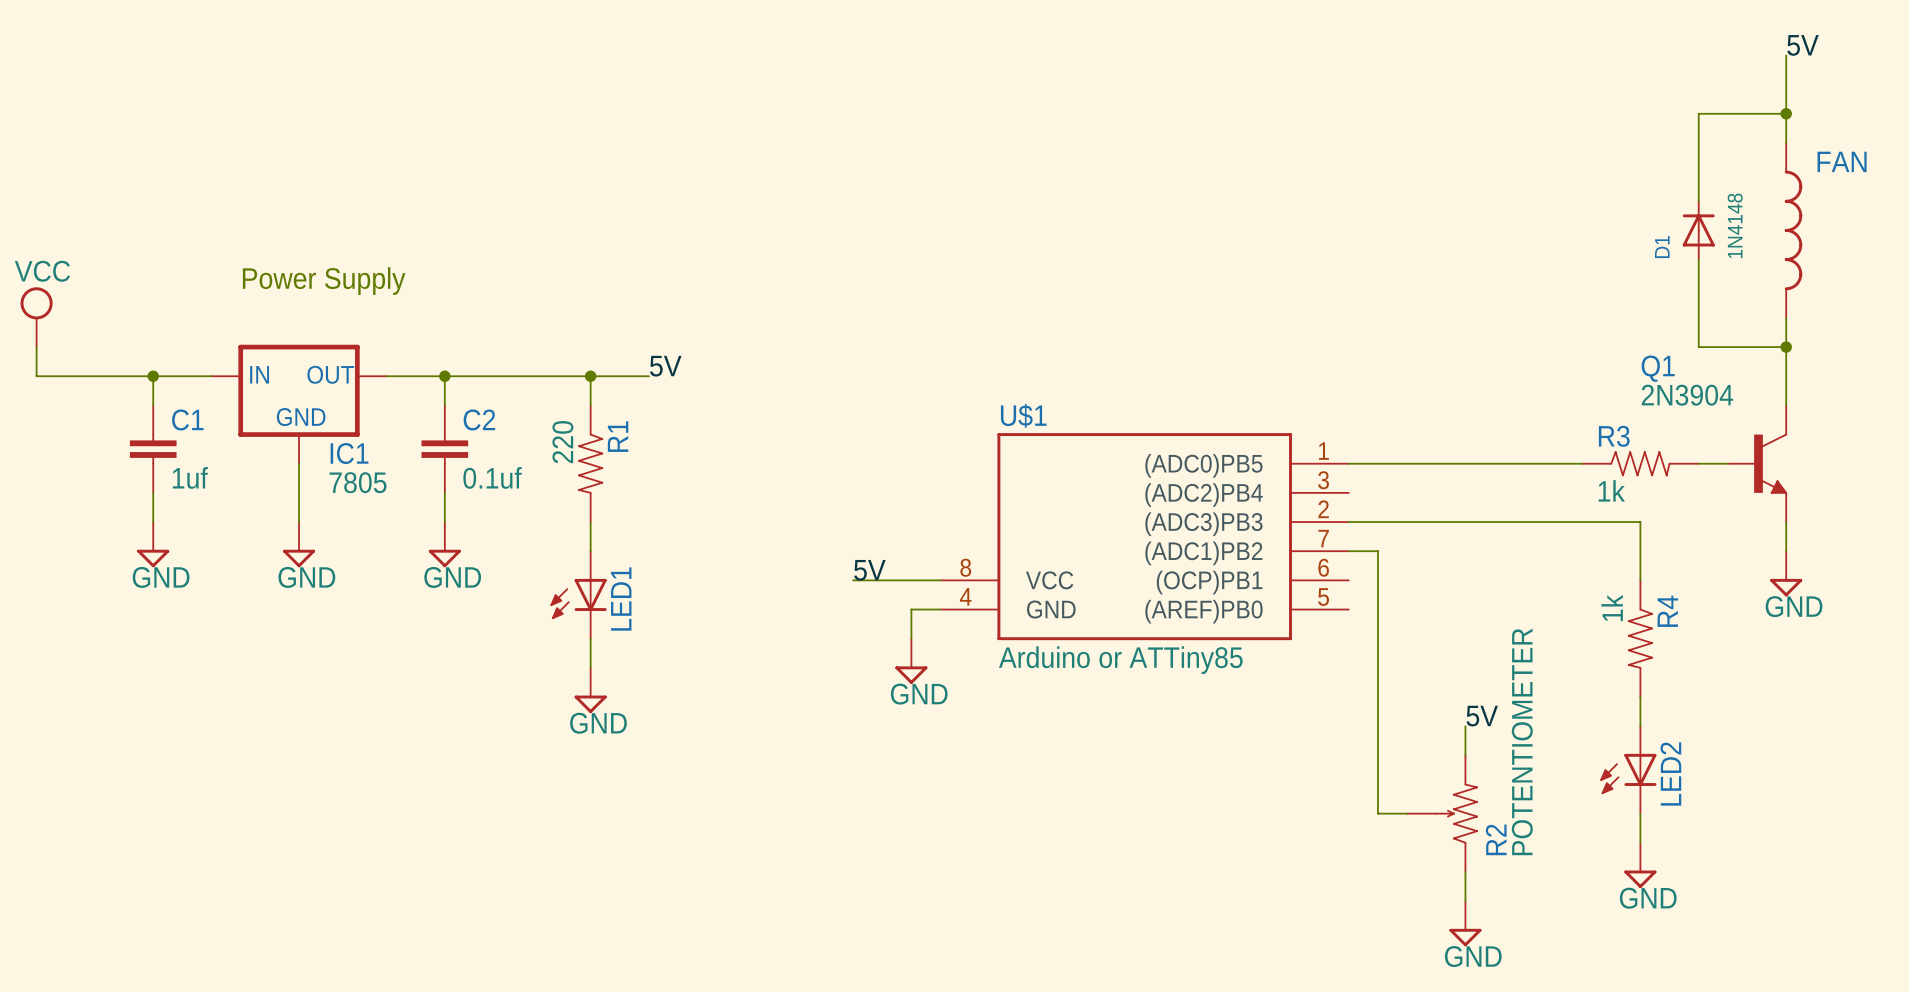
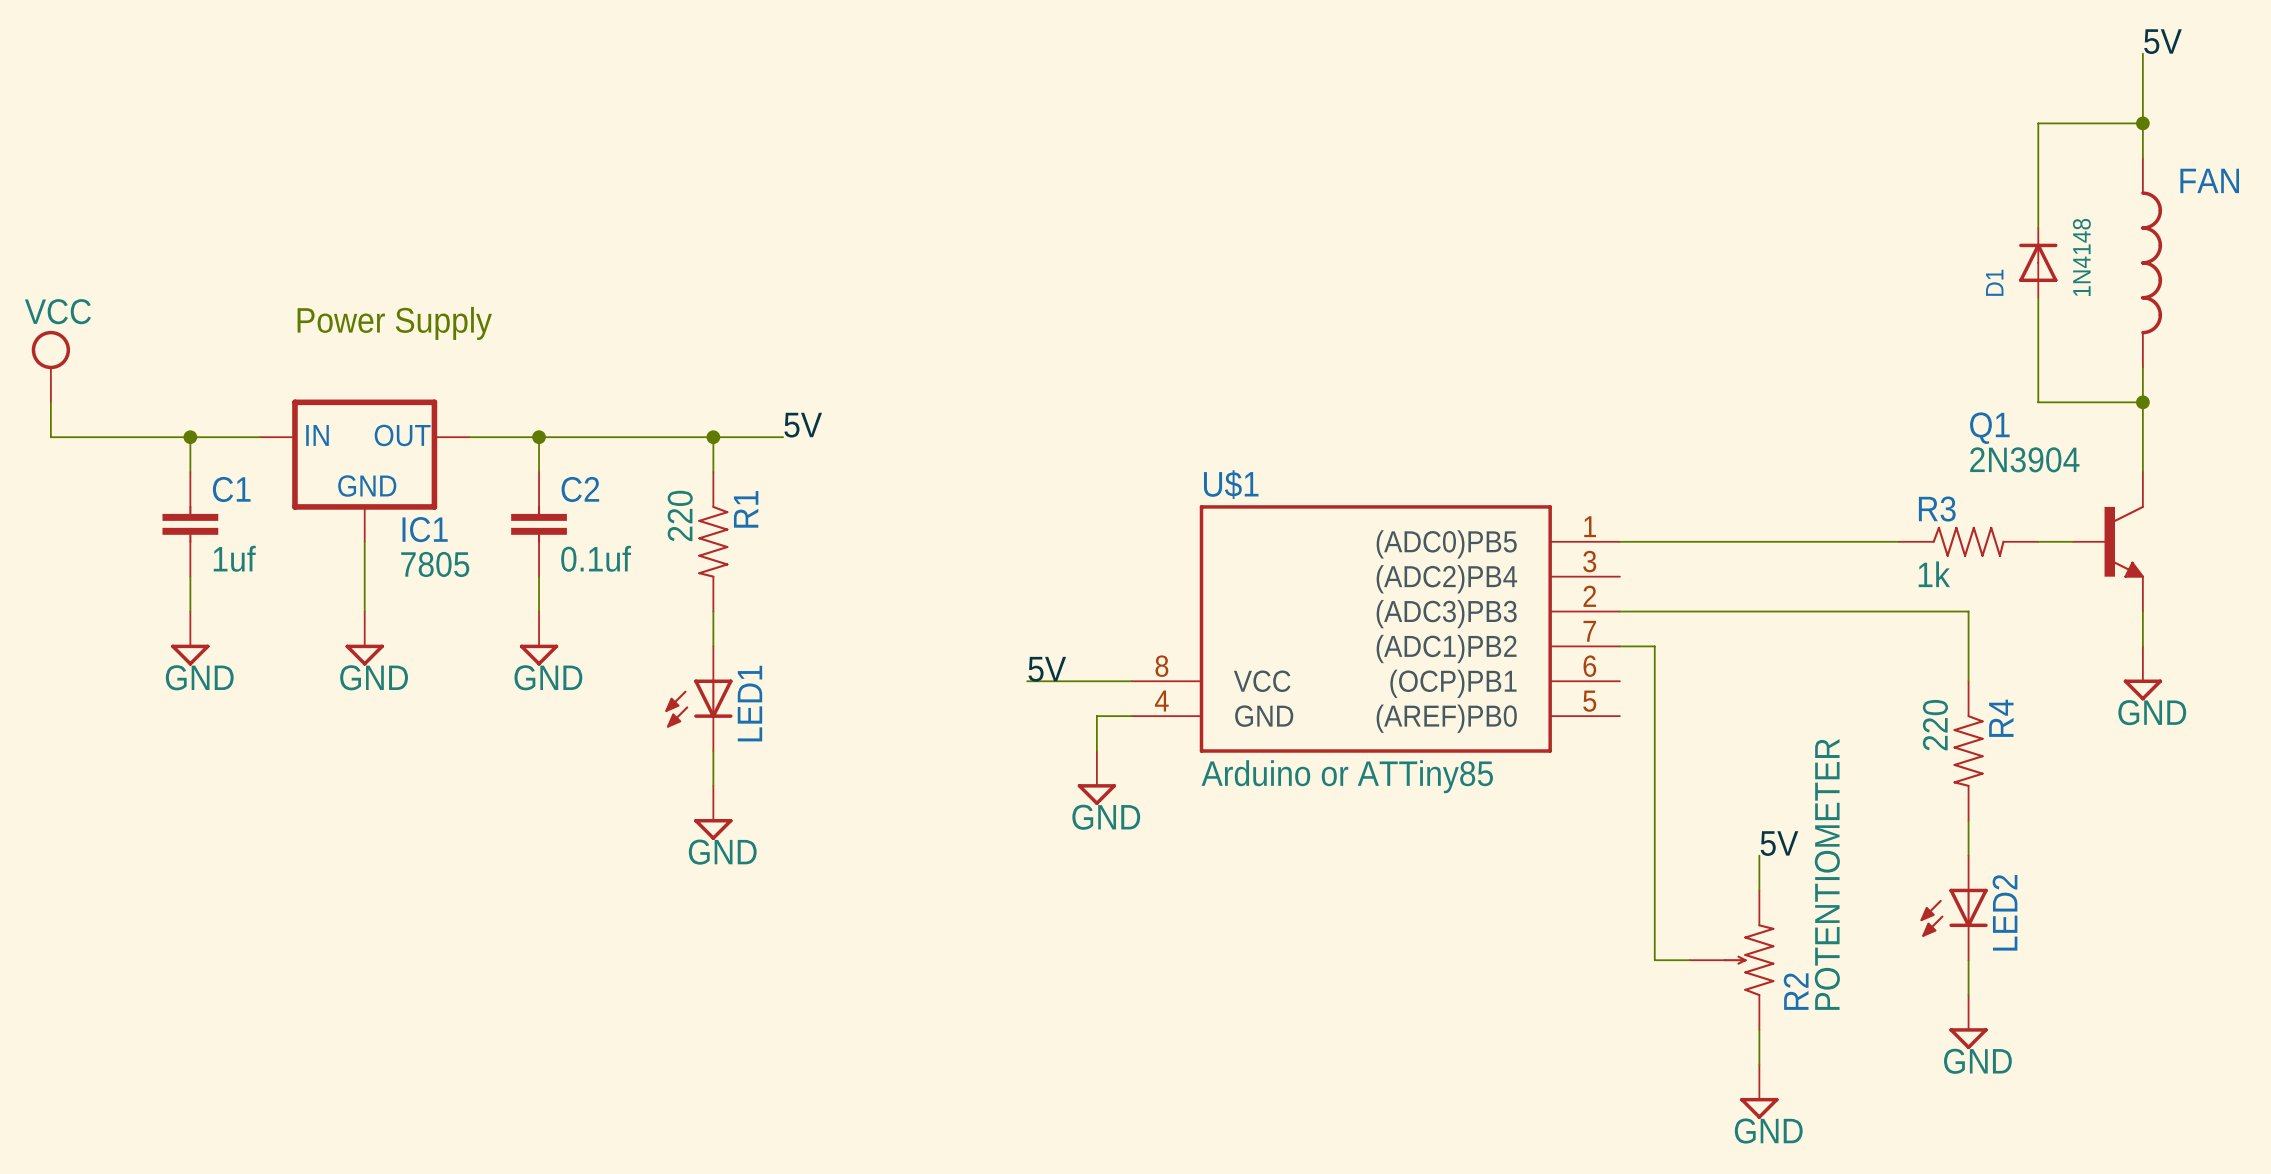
R4 value: 1k (1612, 608) -> 220 (1935, 725)

